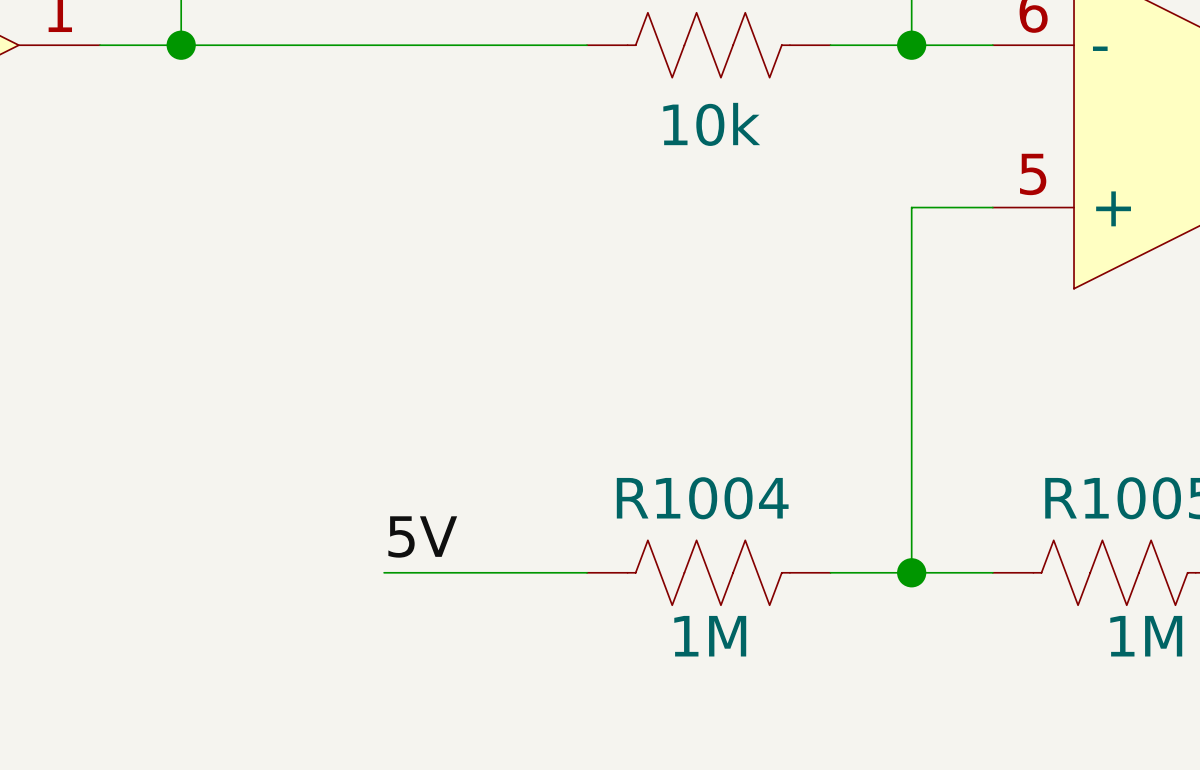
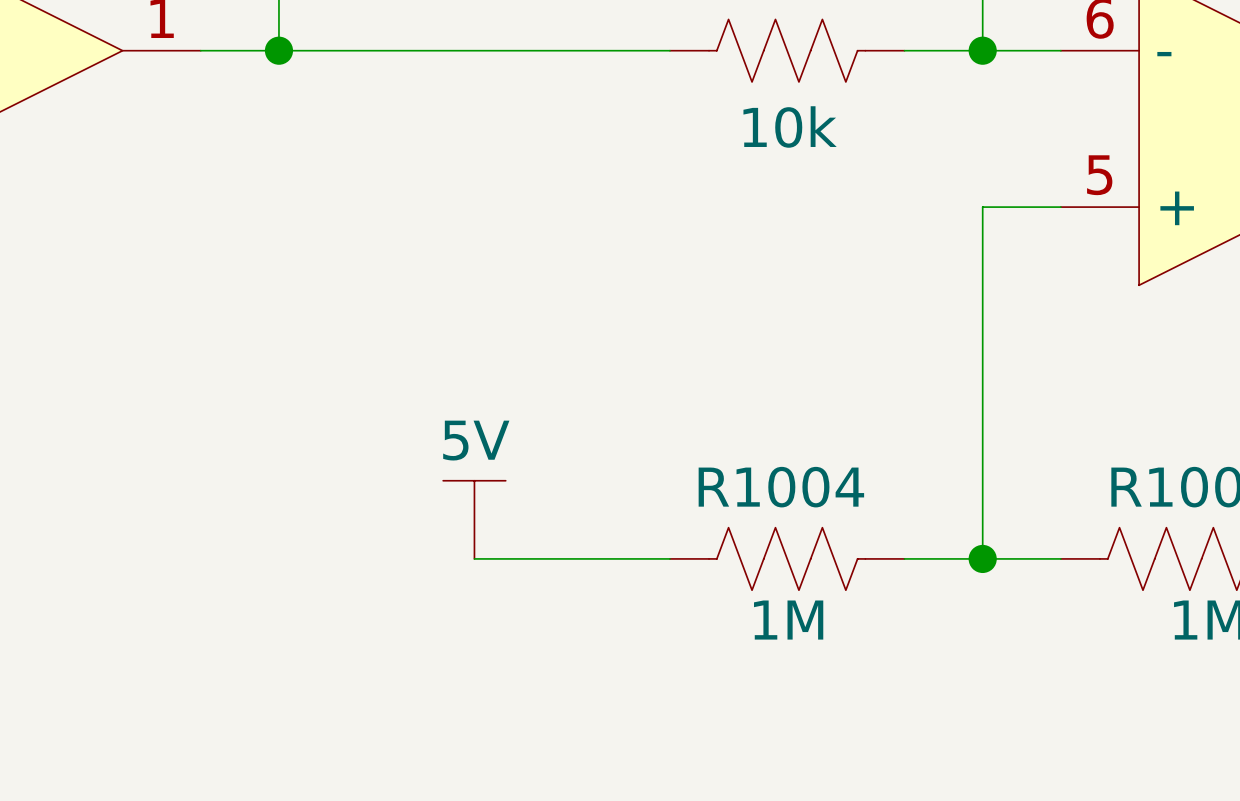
power symbol: none -> 5V (474, 519)
label: 5V (422, 536) -> none

